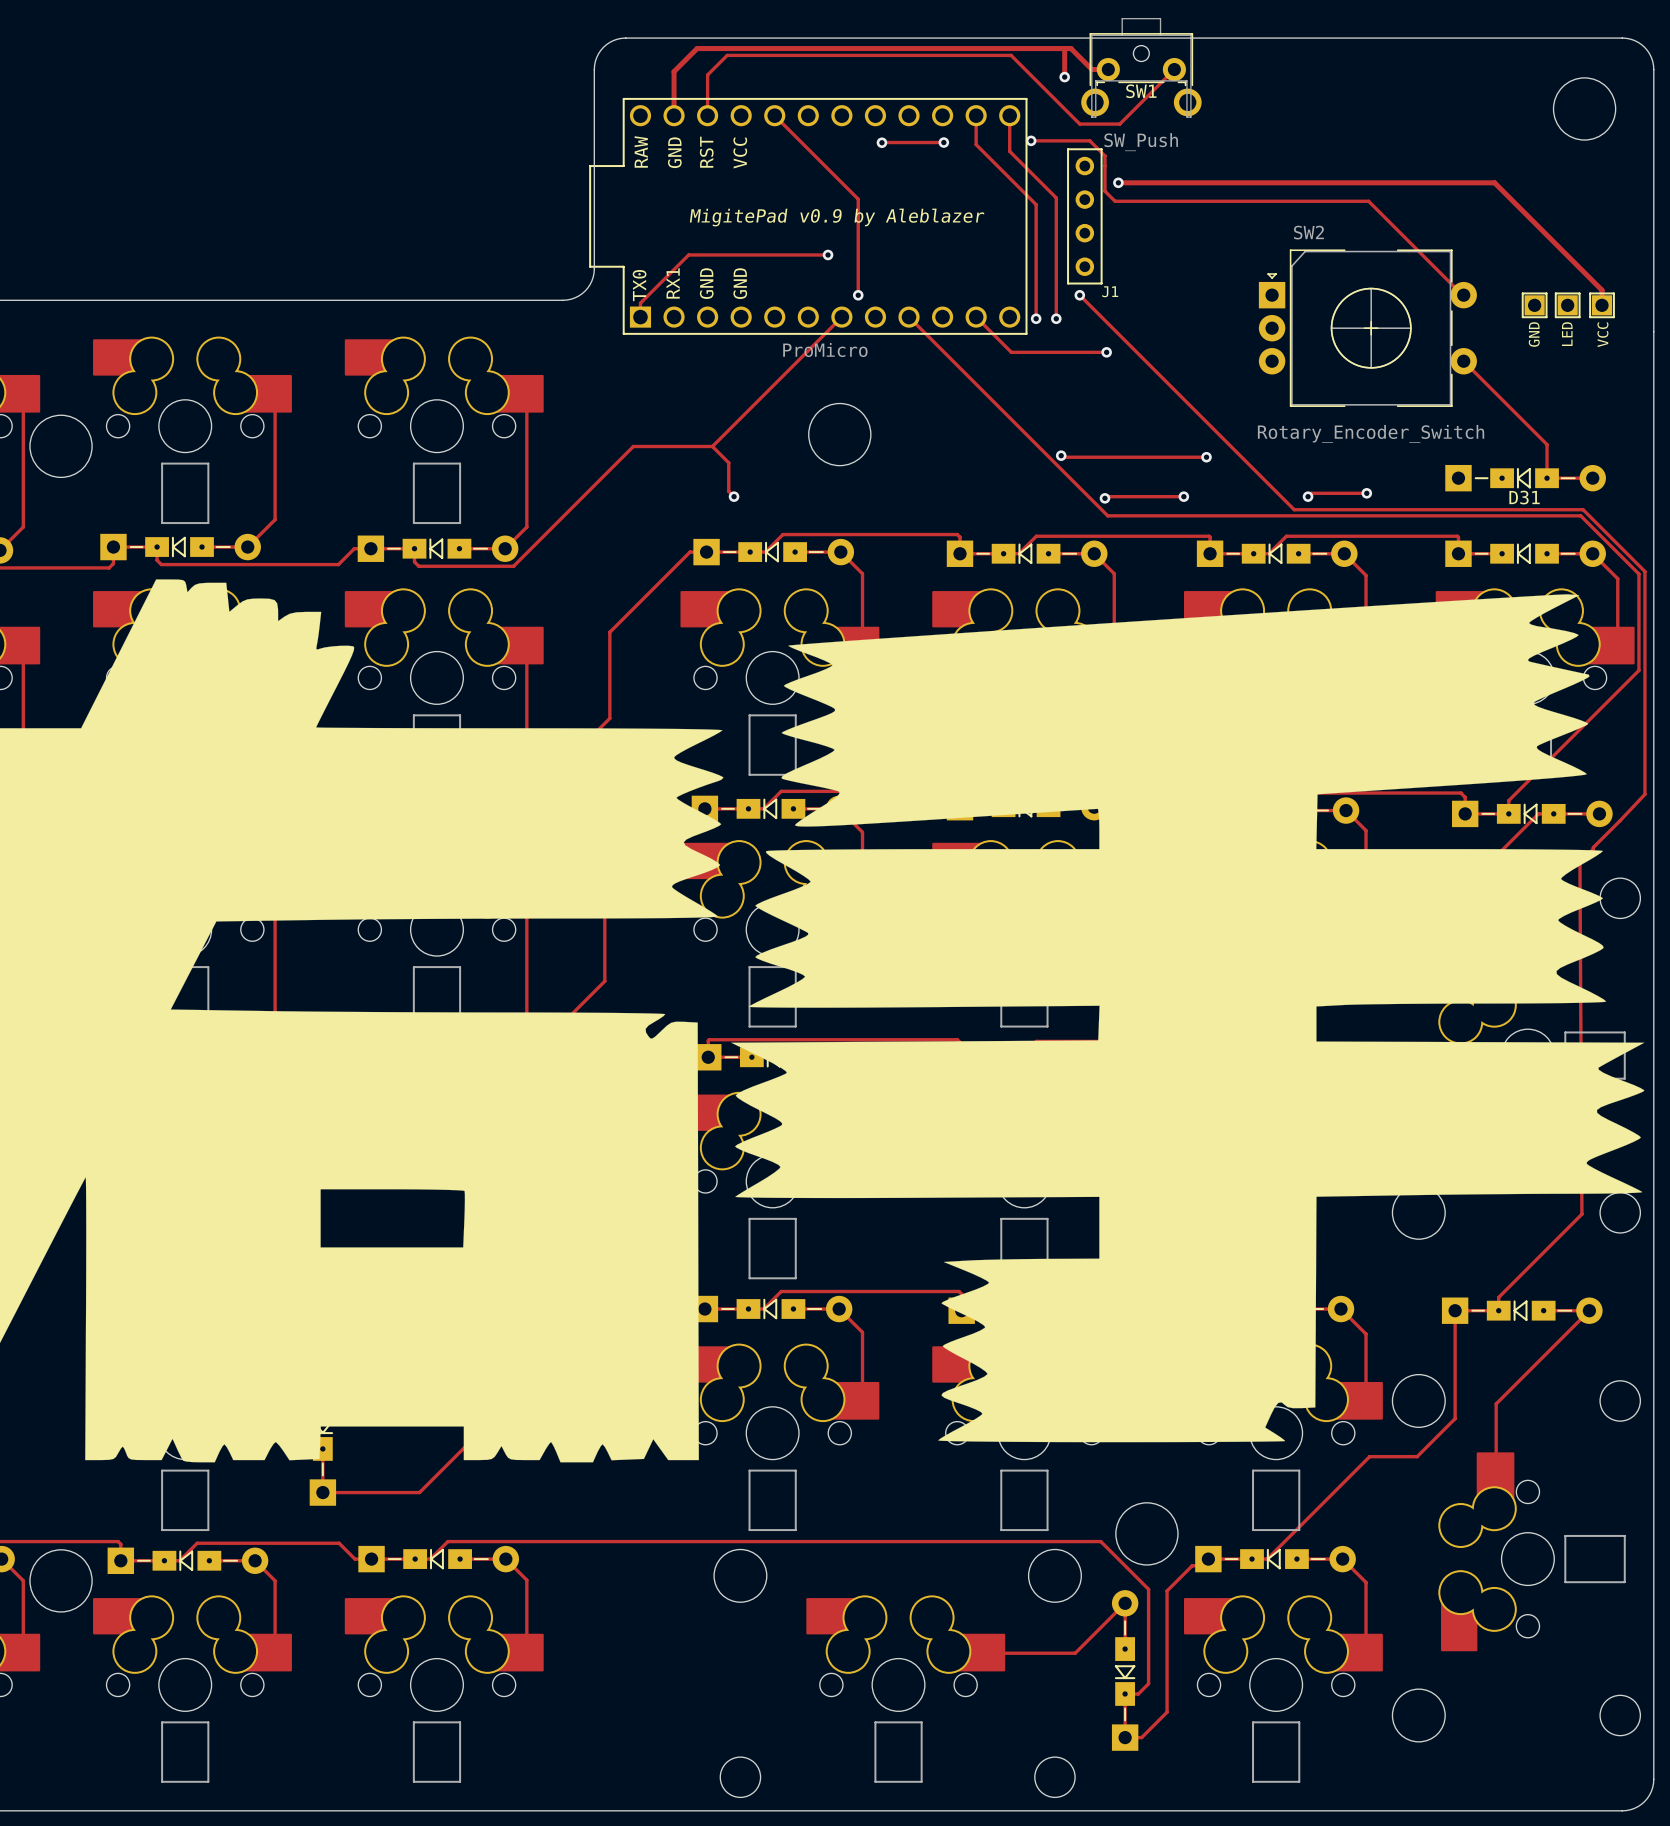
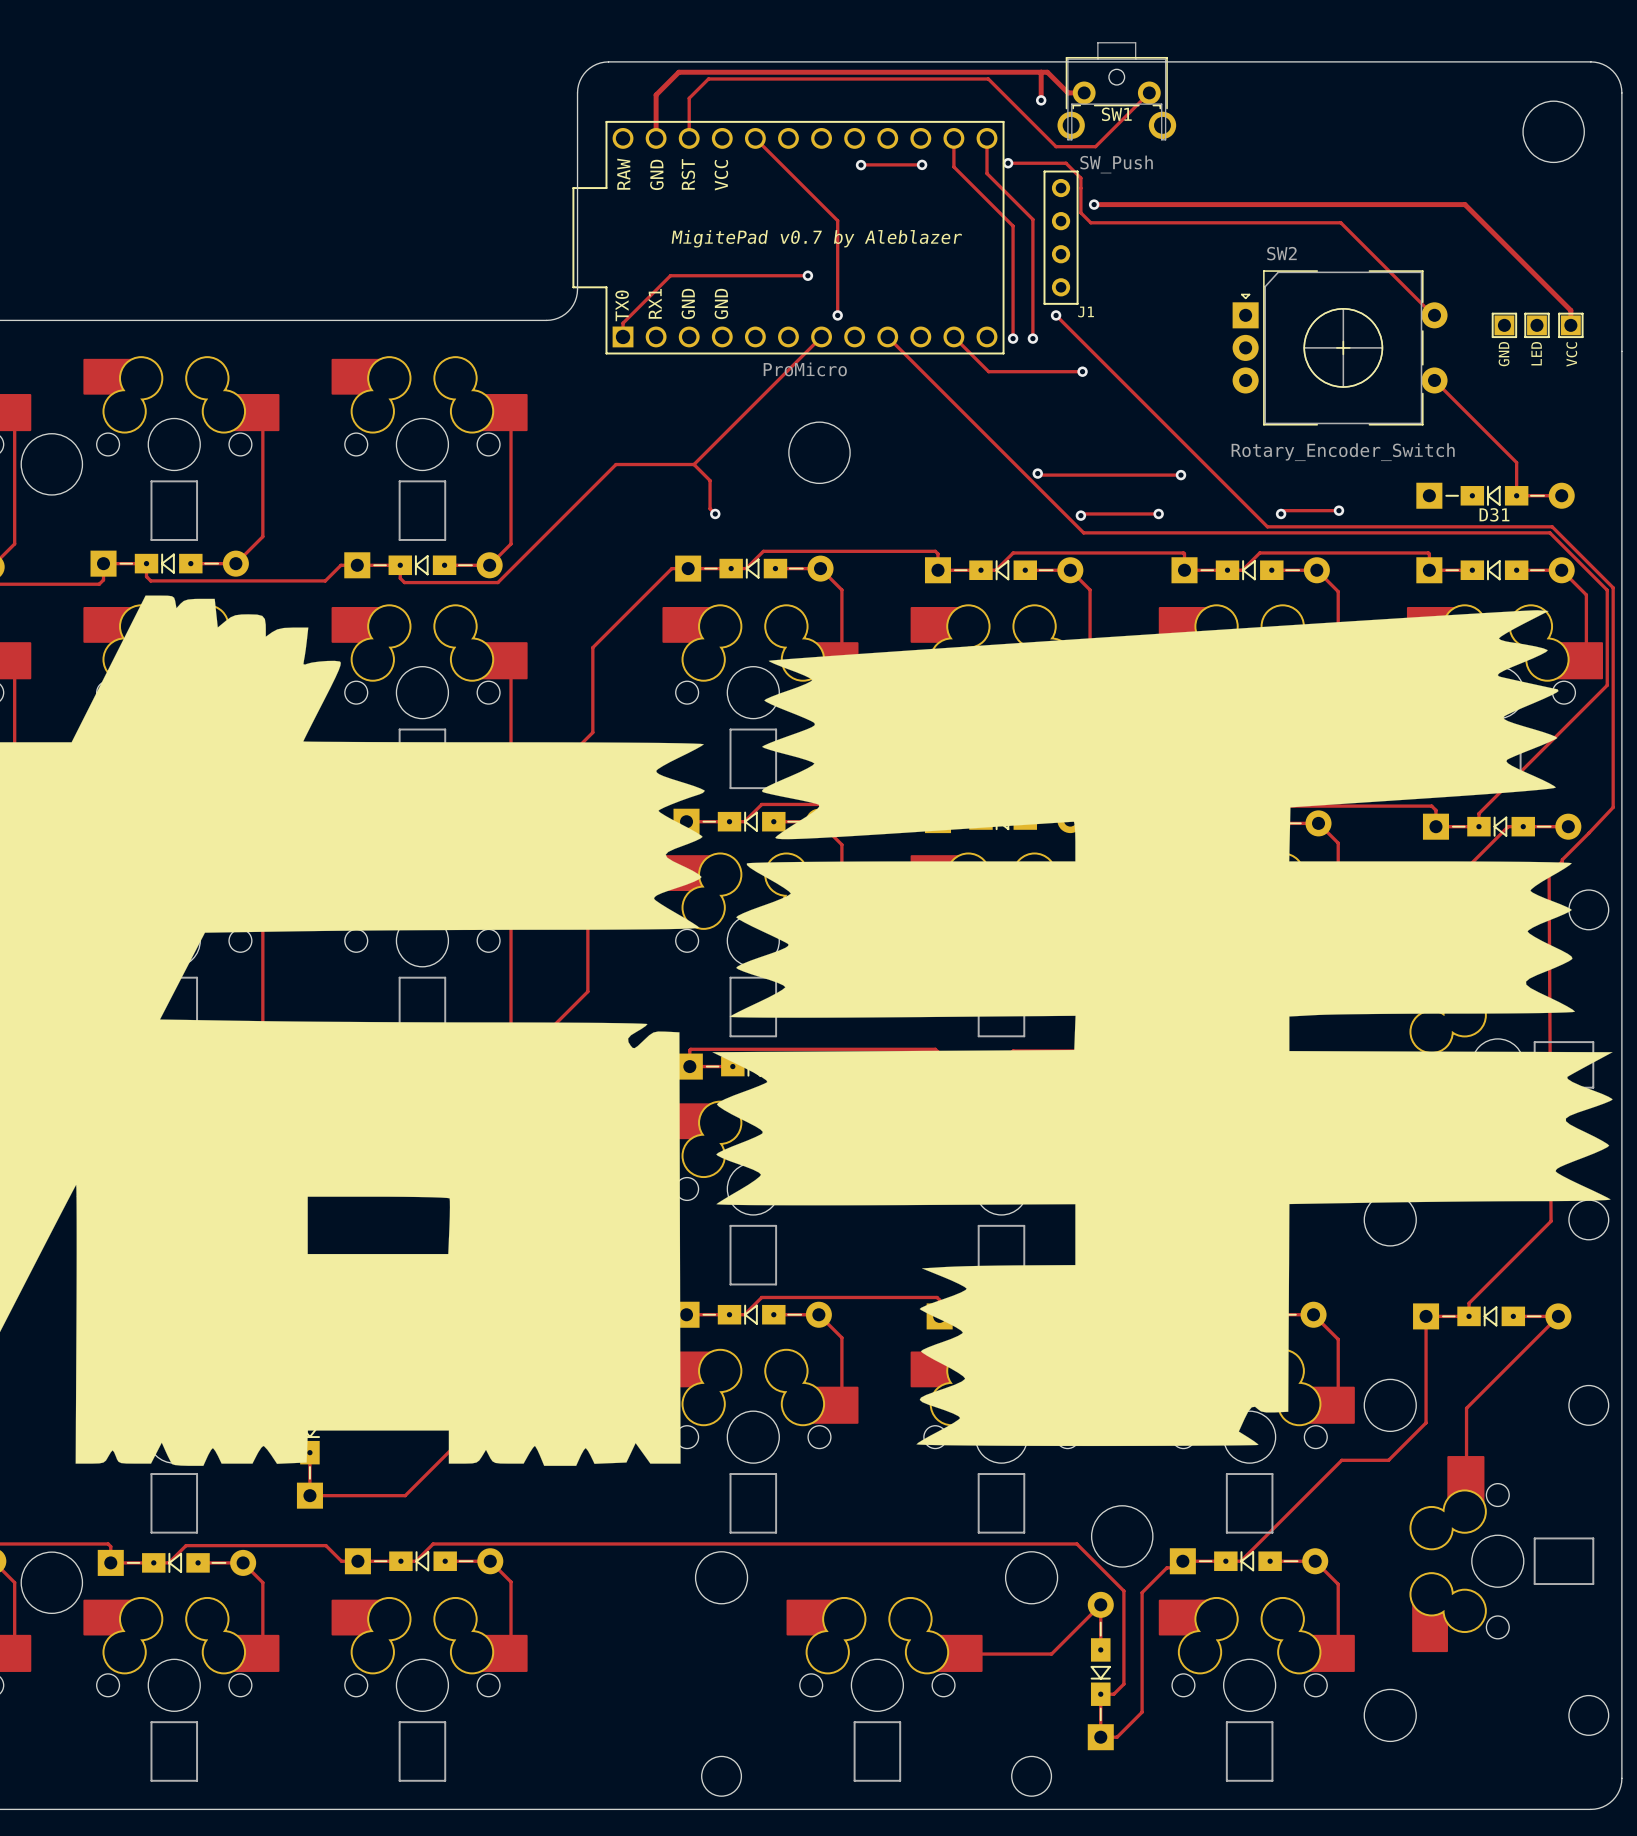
text: MigitePad v0.9 by Aleblazer (837, 217) -> MigitePad v0.7 by Aleblazer (816, 238)

